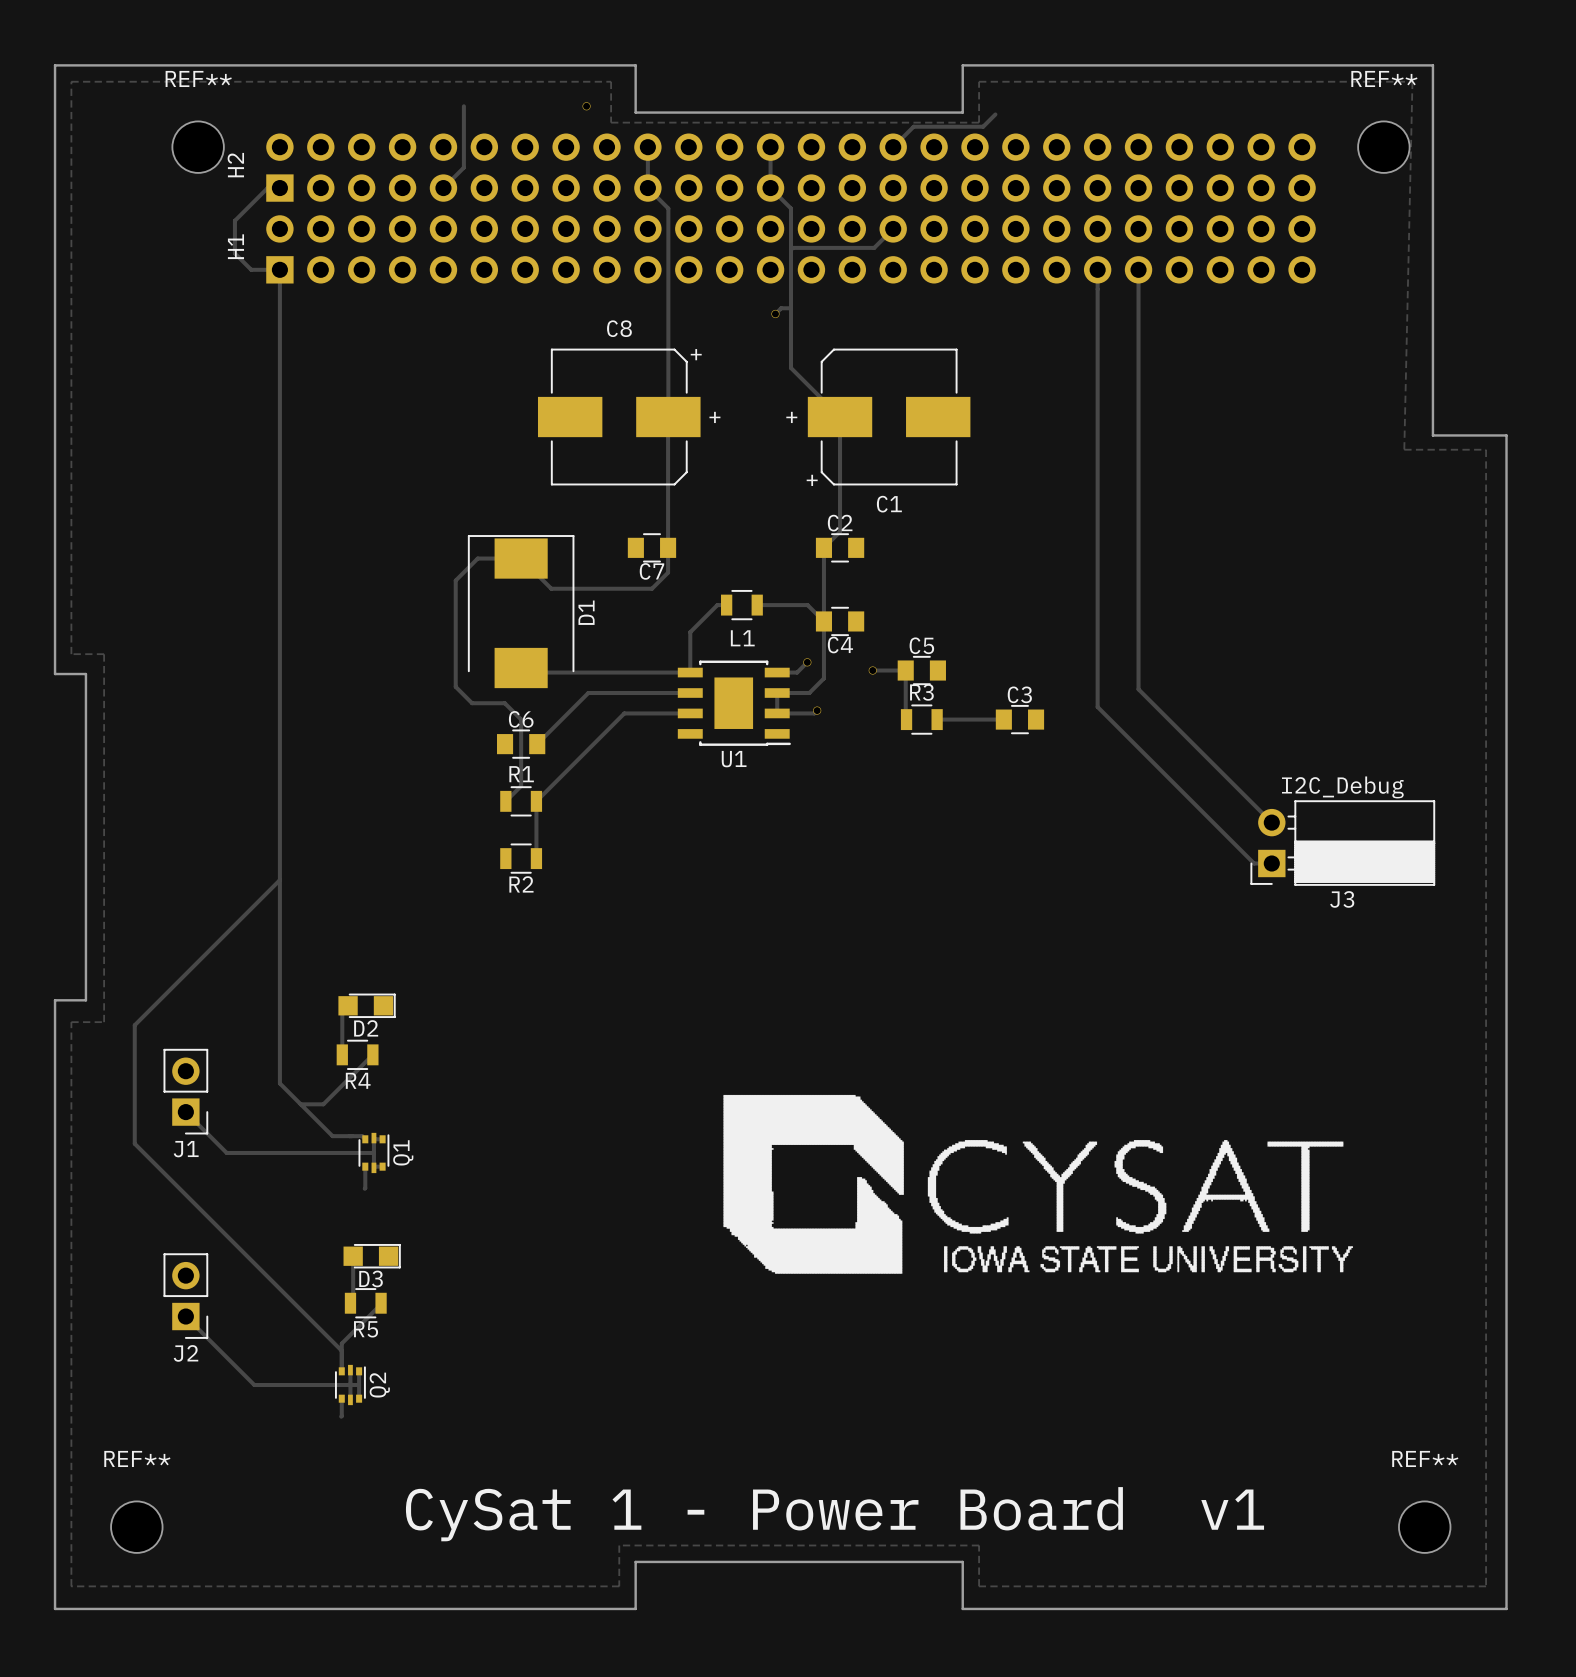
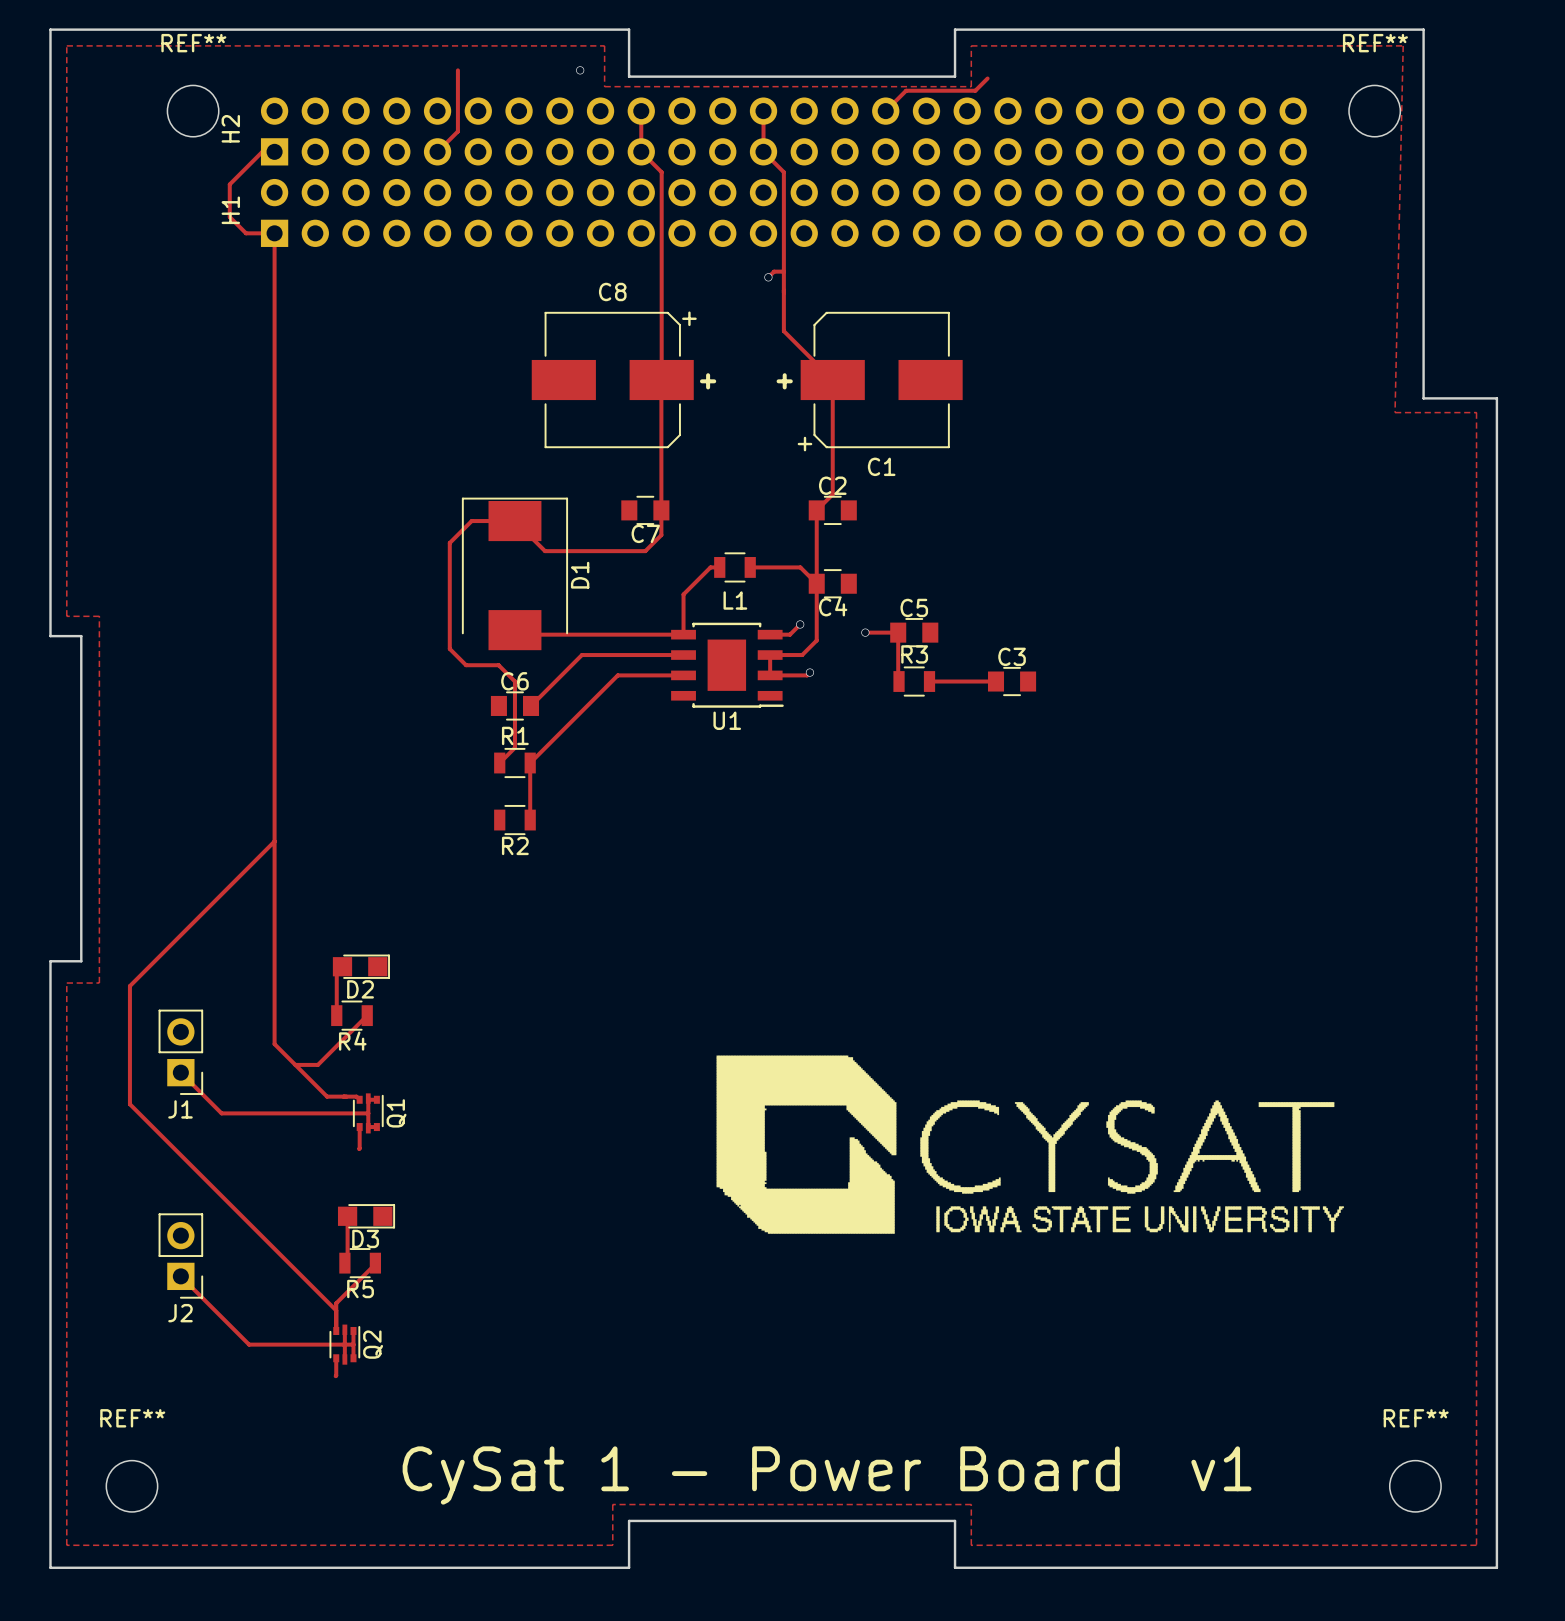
track: (893, 228) (874, 247) (792, 247) (790, 249) -> none
track: (1097, 269) (1097, 707) (1254, 863) (1271, 863) -> none
track: (1138, 269) (1138, 689) (1271, 822) -> none
J3: I2C_Debug (1342, 843) -> none

